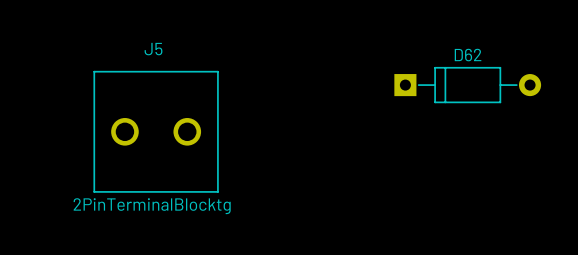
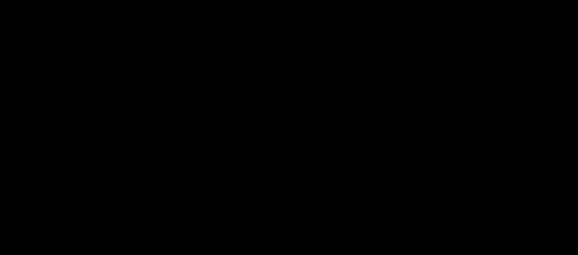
D62: (467, 85) -> none
J5: 2PinTerminalBlocktg (156, 131) -> none

